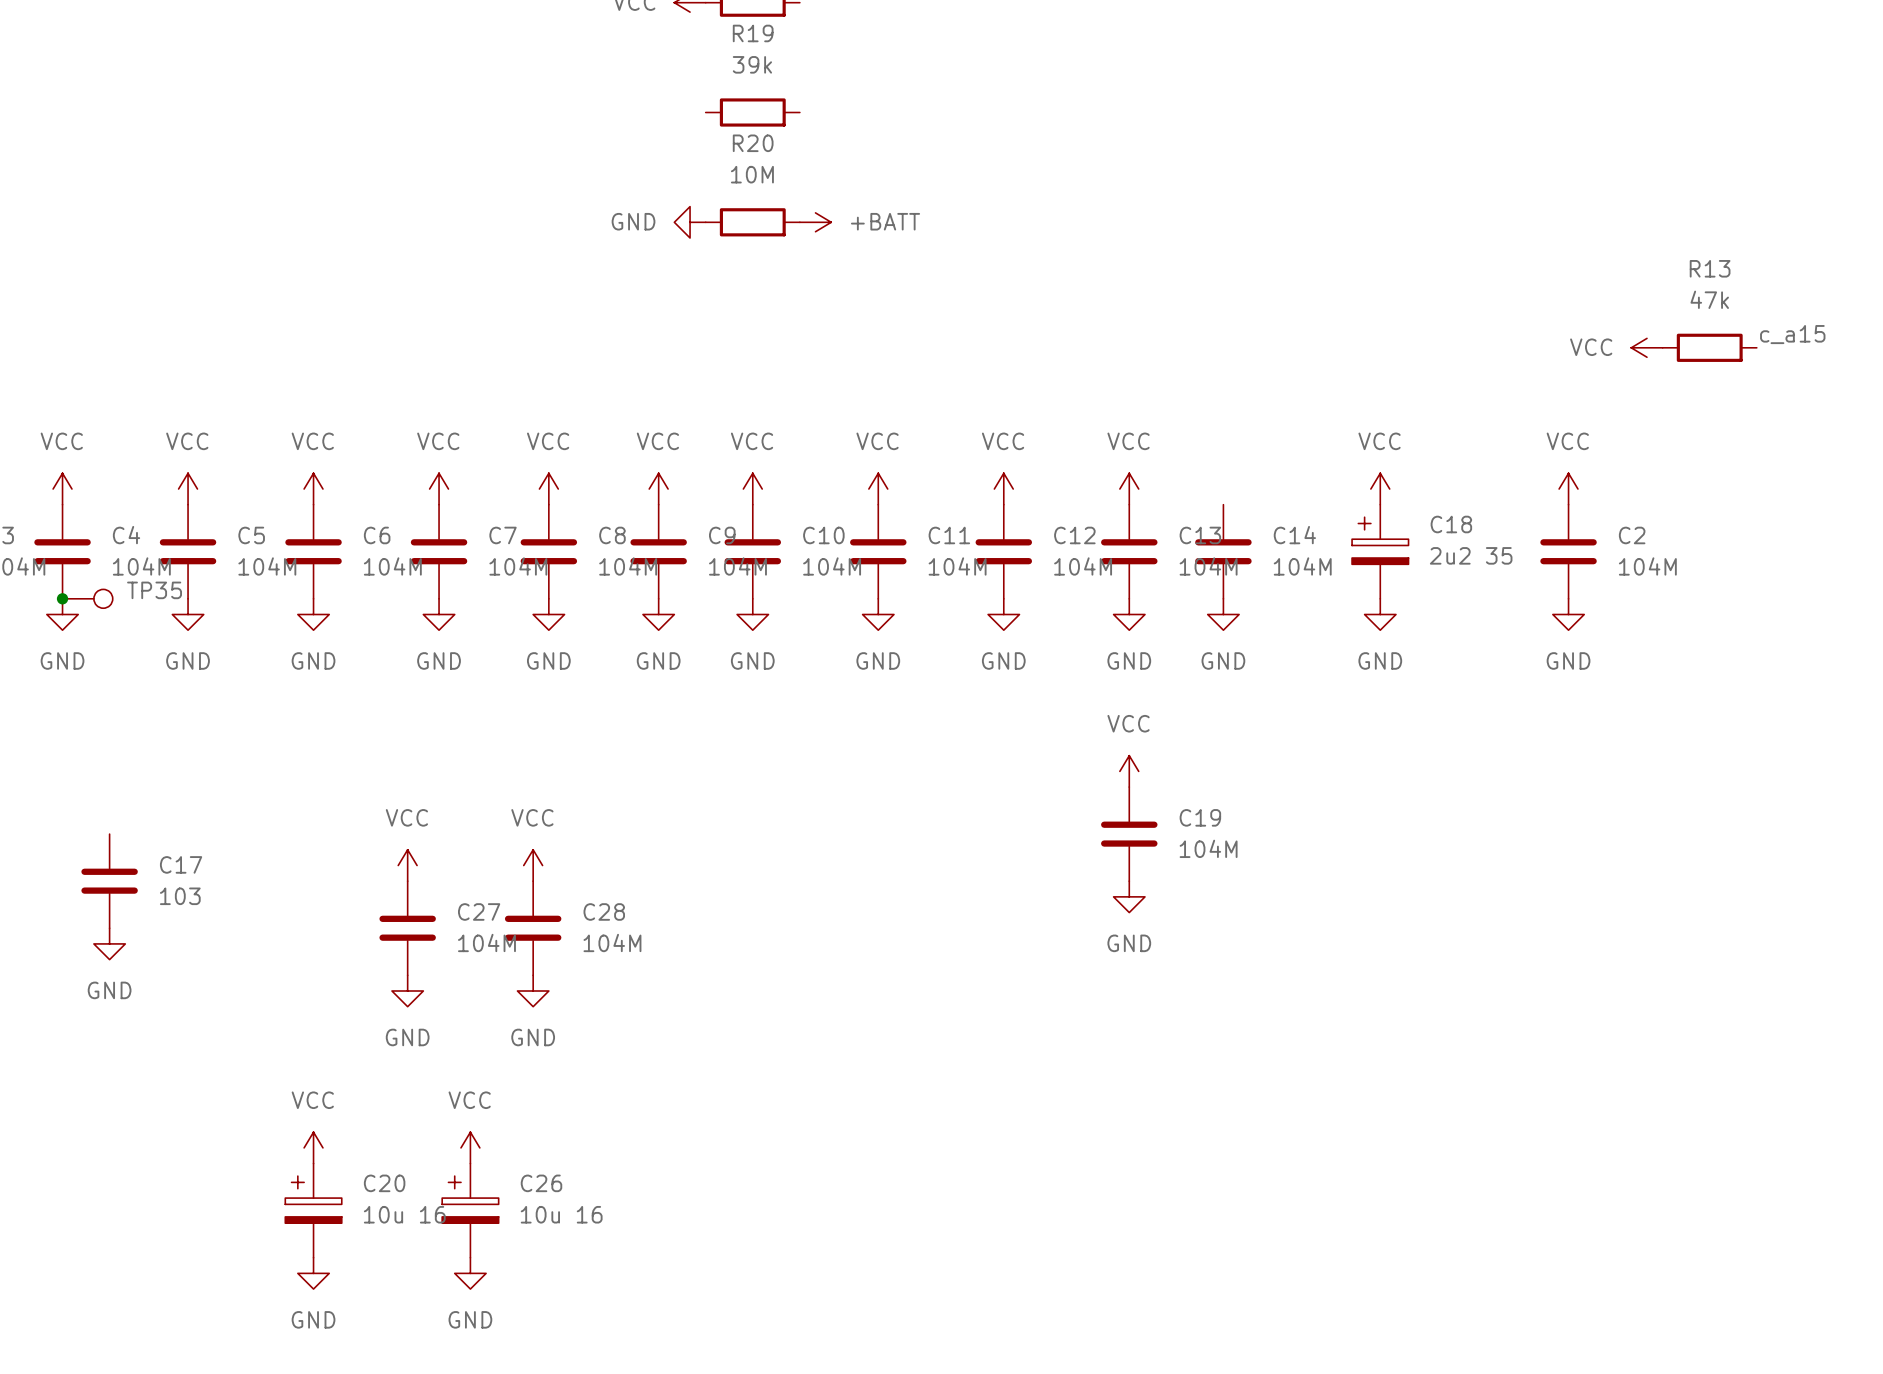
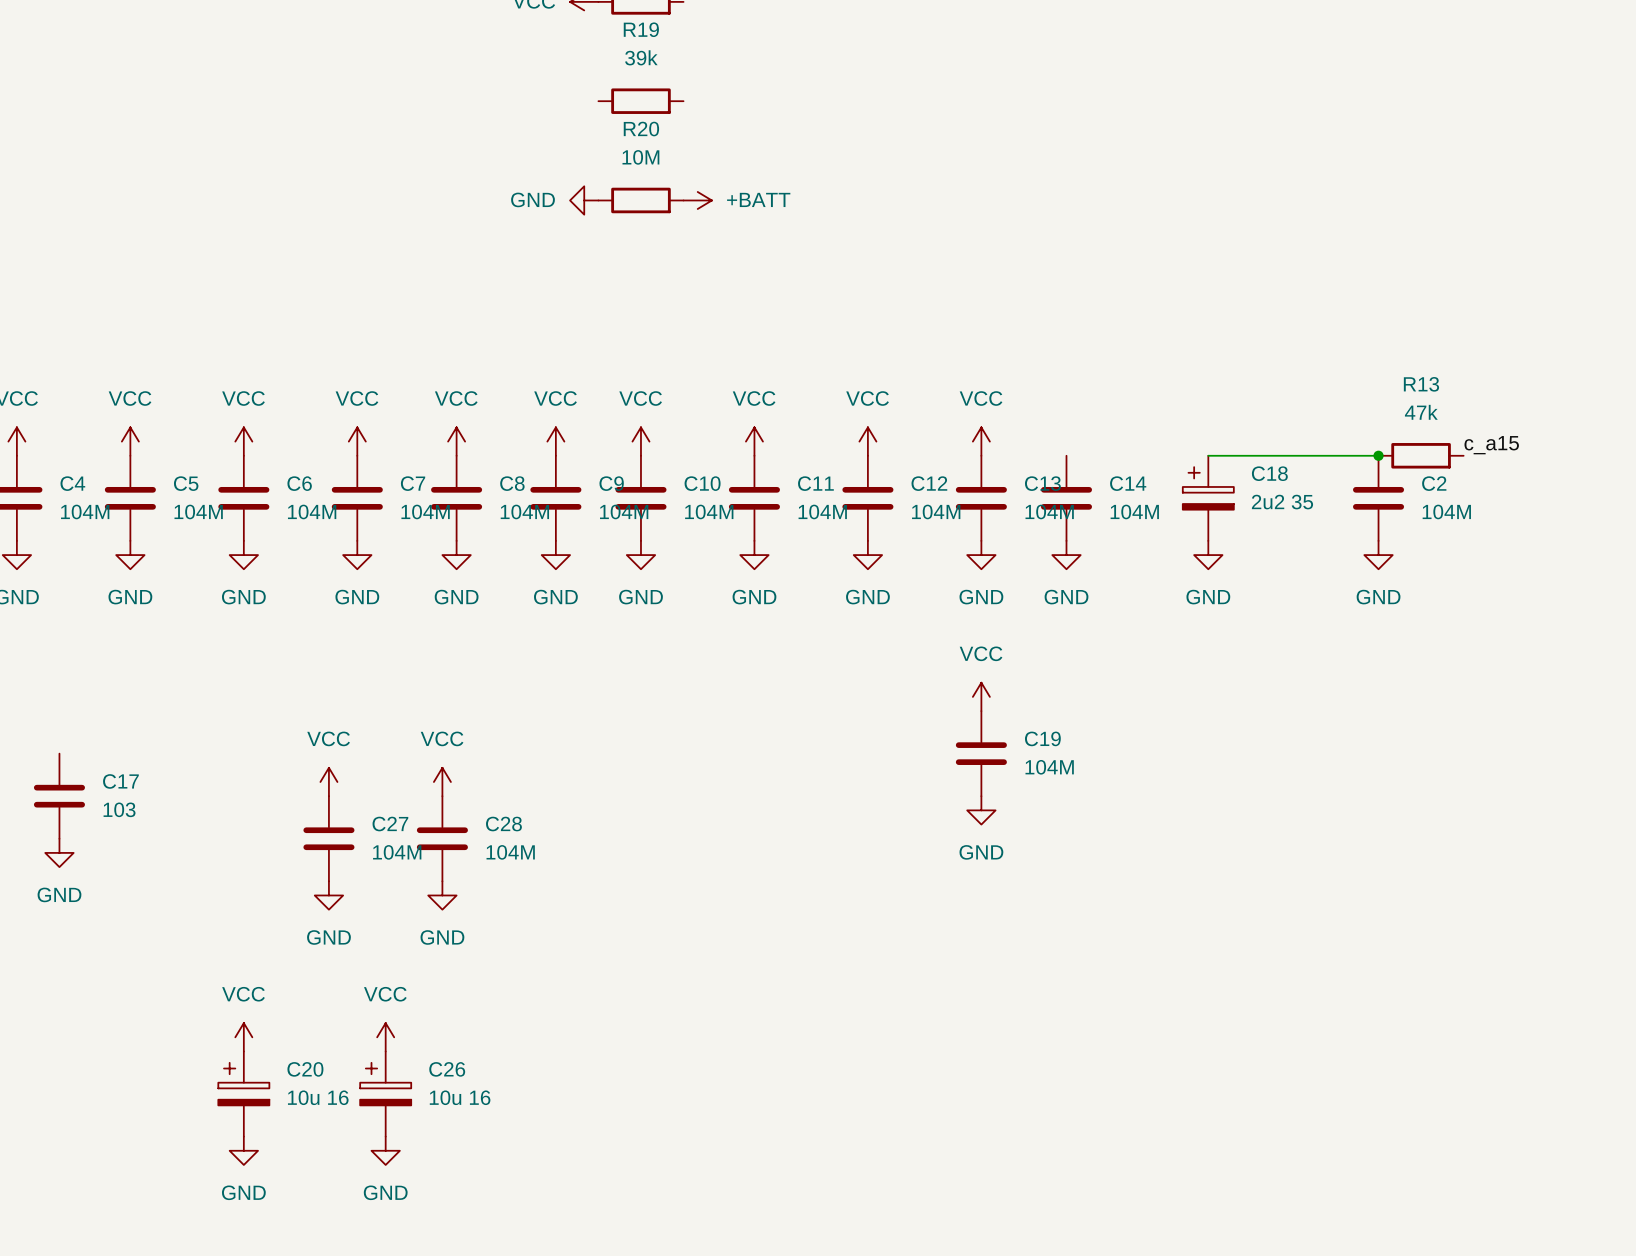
label position: c_a15 (1792, 334) -> c_a15 (1491, 445)
power symbol: VCC (1646, 347) -> none
R13 position: (1709, 347) -> (1421, 455)
power symbol: VCC (1380, 489) -> none
power symbol: VCC (1568, 489) -> none
wire: none -> (1208, 455) (1378, 455)
junction: none -> (1378, 455)
junction: (62, 598) -> none
TP35: (87, 598) -> none

